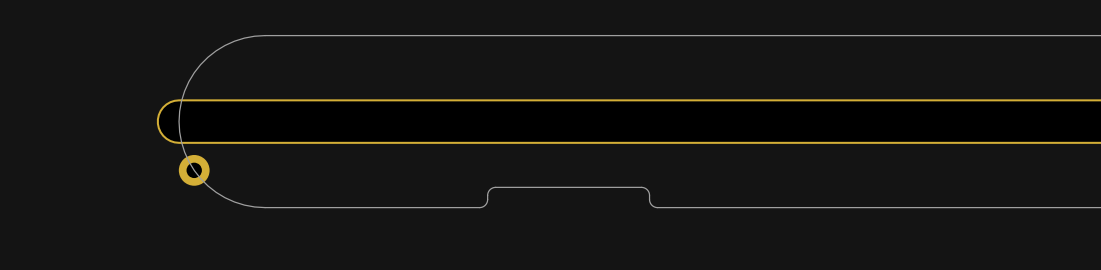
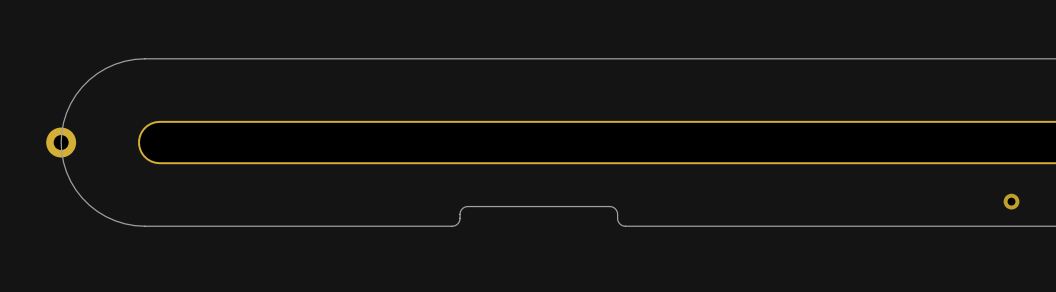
board edge: (265, 35) (244, 38) (225, 45) (200, 64) (184, 91) (179, 121) (184, 152) (200, 178) (216, 192) (234, 202) (265, 207) -> (243, 58) (134, 59) (105, 68) (82, 87) (70, 103) (63, 122) (61, 142) (63, 162) (70, 181) (82, 198) (105, 216) (134, 225) (243, 226)
part position: (194, 170) -> (61, 142)
via: none -> (1011, 201)

